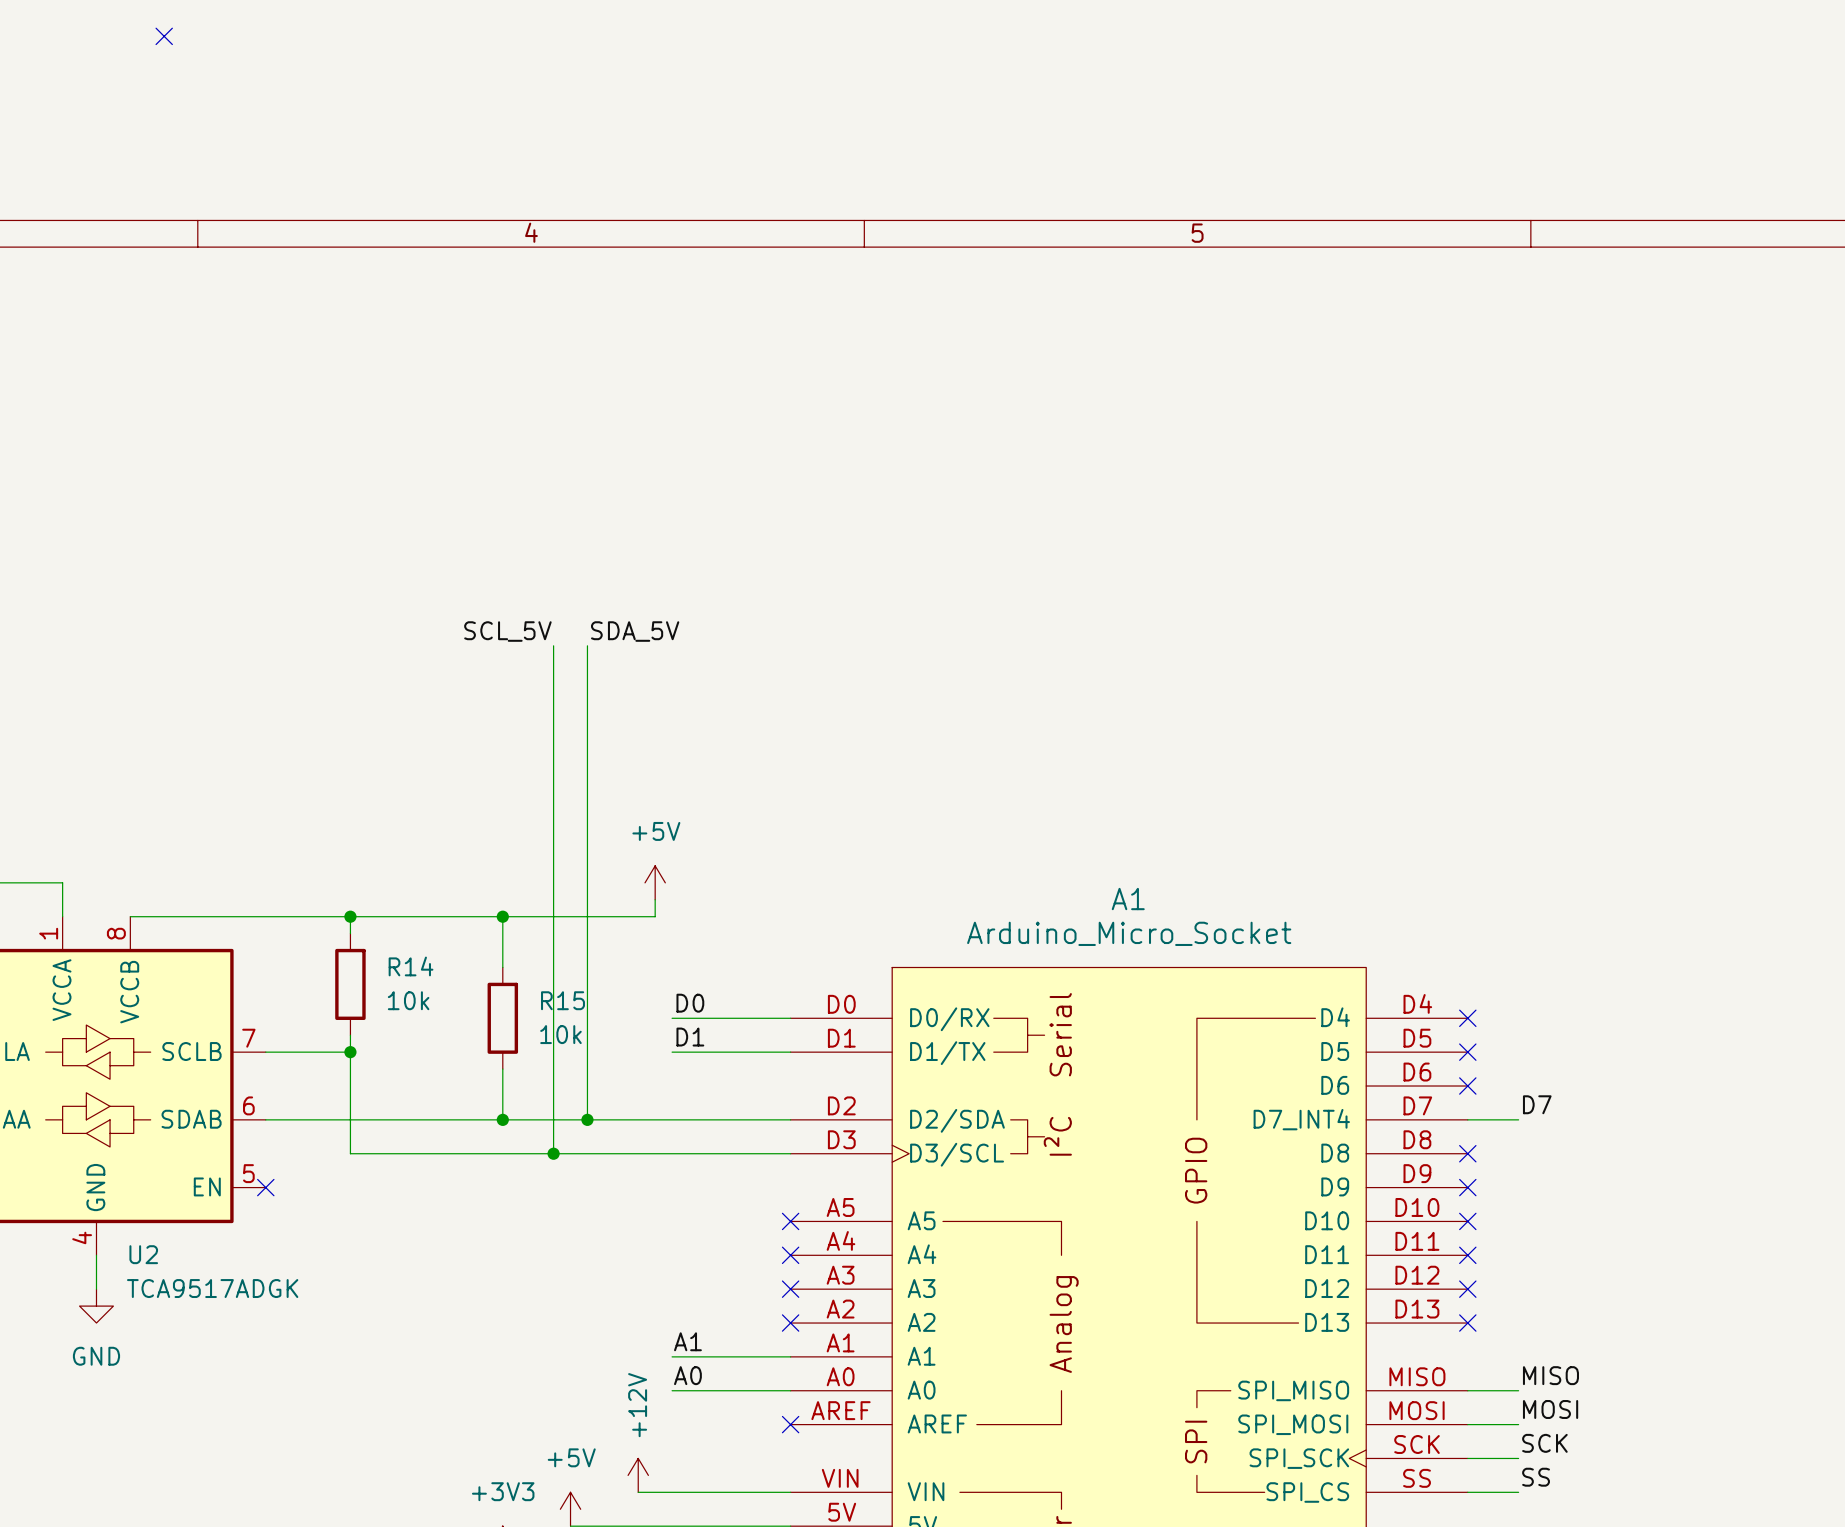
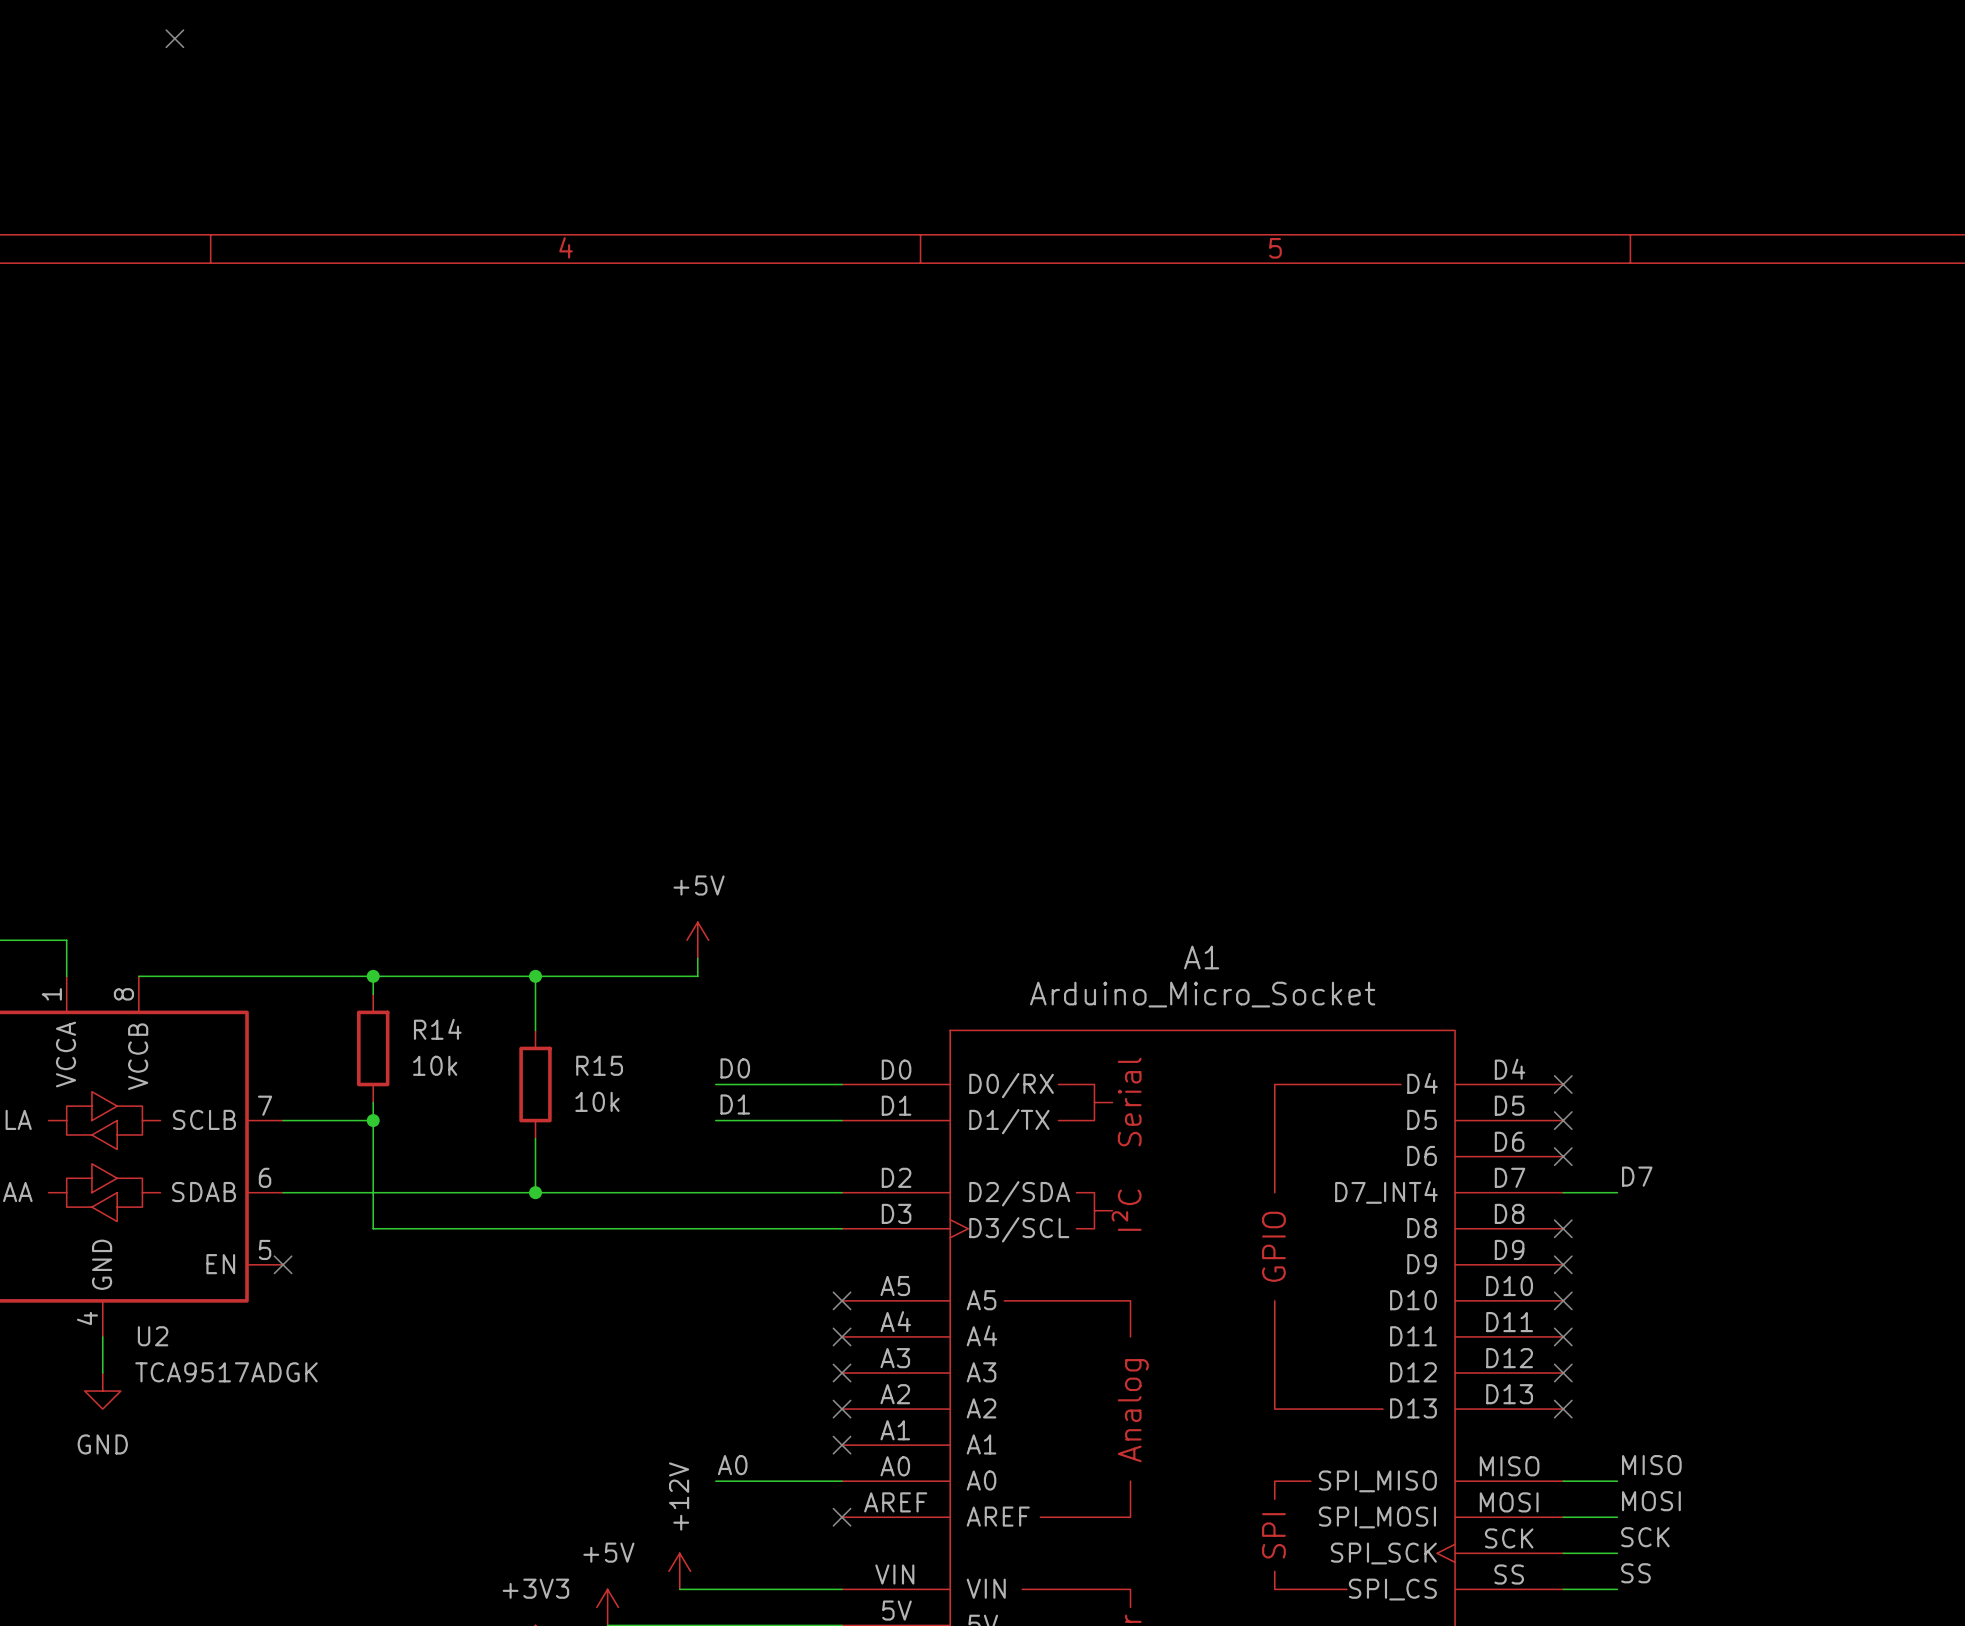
label: SCL_5V (507, 631) -> none
label: SDA_5V (635, 631) -> none
wire: (553, 645) (553, 1153) -> none
wire: (587, 645) (587, 1119) -> none
junction: (587, 1119) -> none
junction: (553, 1153) -> none
label: A1 (687, 1341) -> none
wire: (672, 1356) (790, 1356) -> none
no-connect mark: none -> (842, 1445)

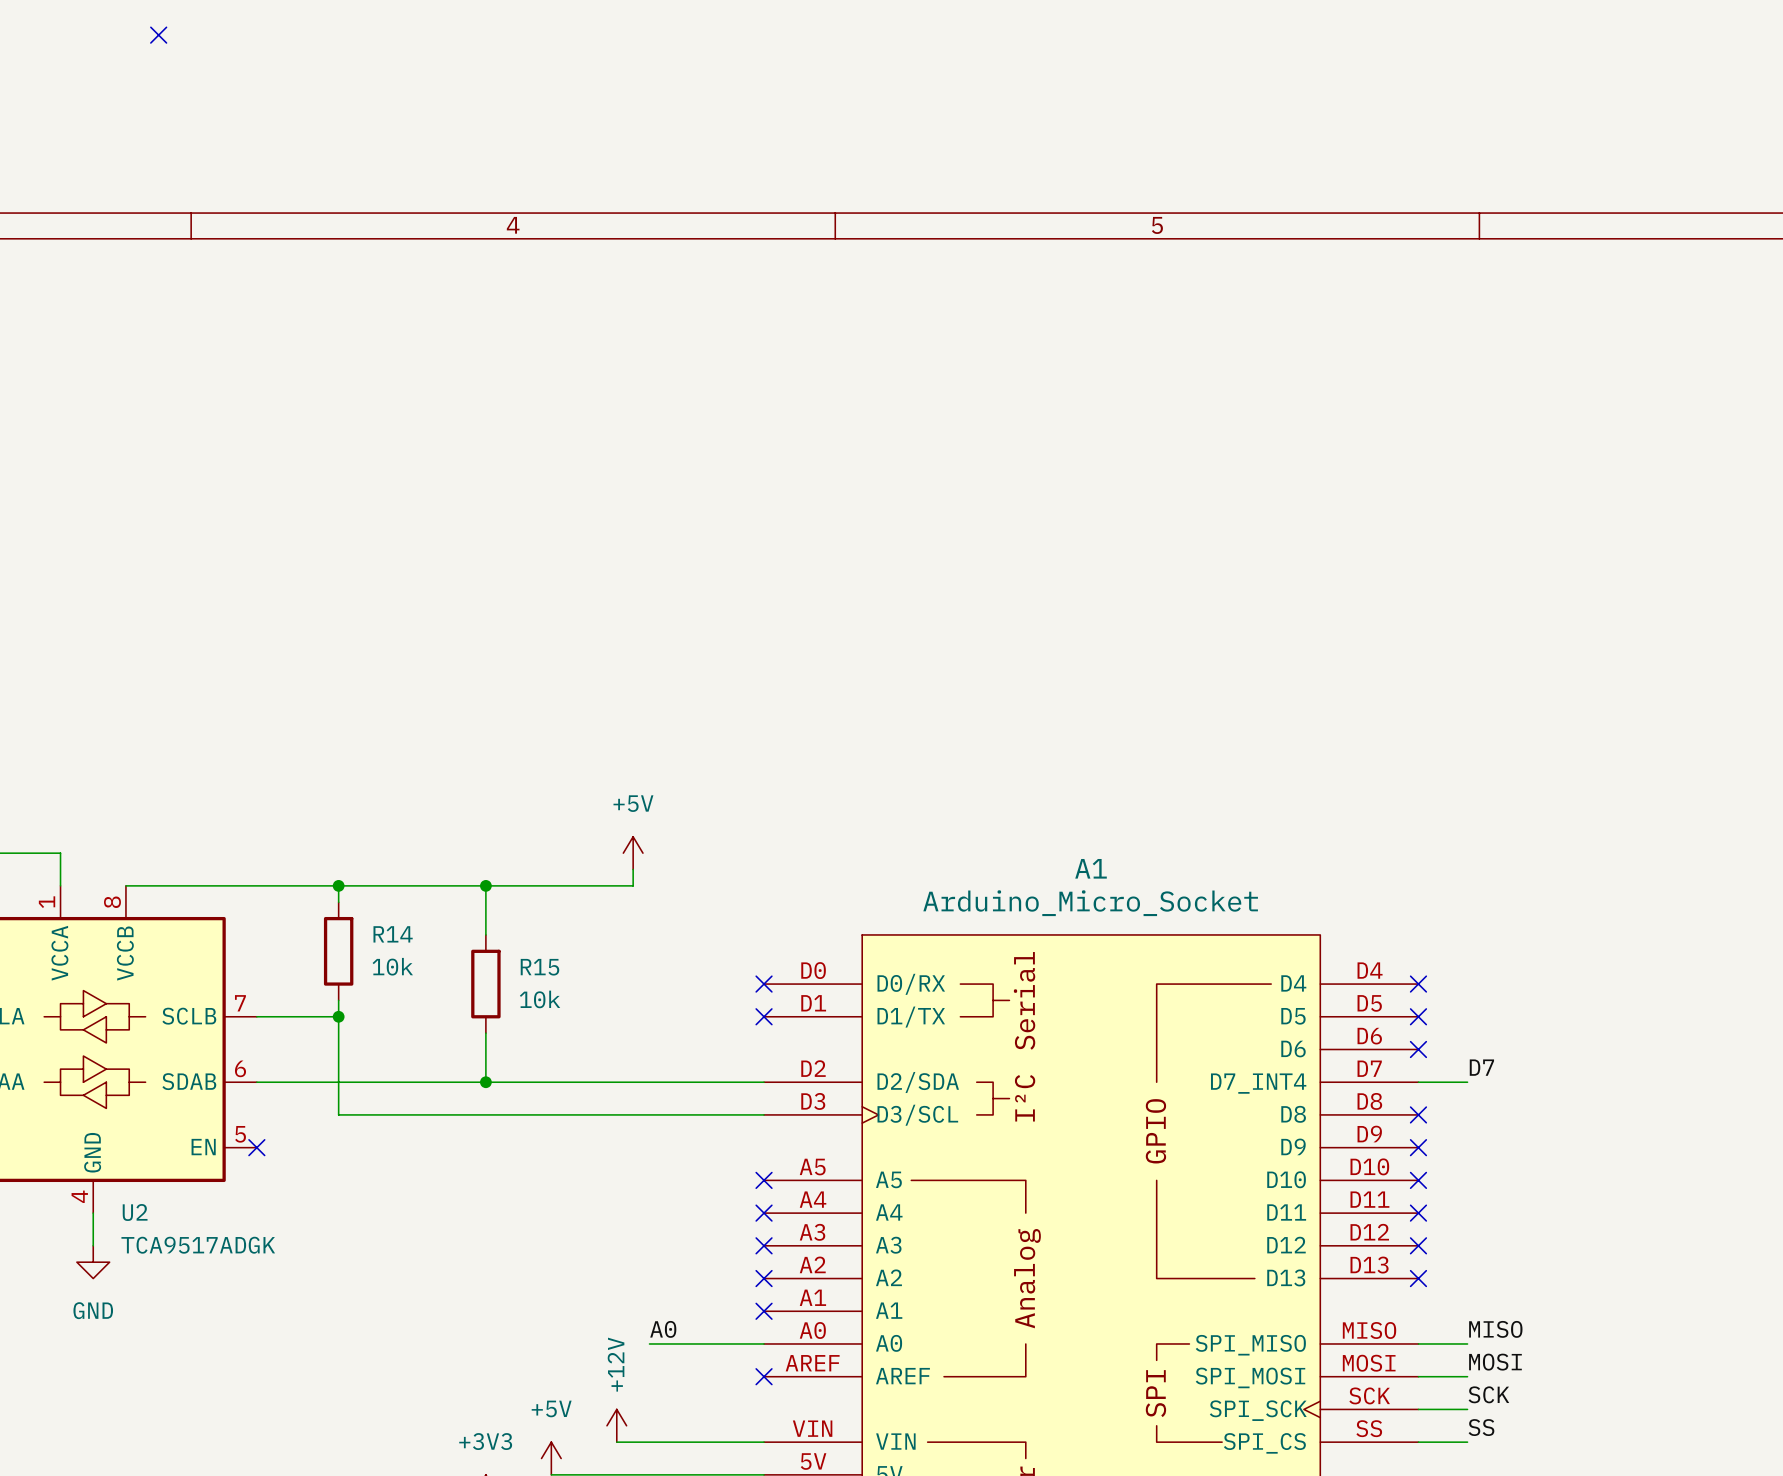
label: D0 (735, 1068) -> none
wire: (715, 1084) (842, 1084) -> none
no-connect mark: none -> (764, 984)
label: D1 (735, 1104) -> none
wire: (715, 1120) (842, 1120) -> none
no-connect mark: none -> (764, 1016)

